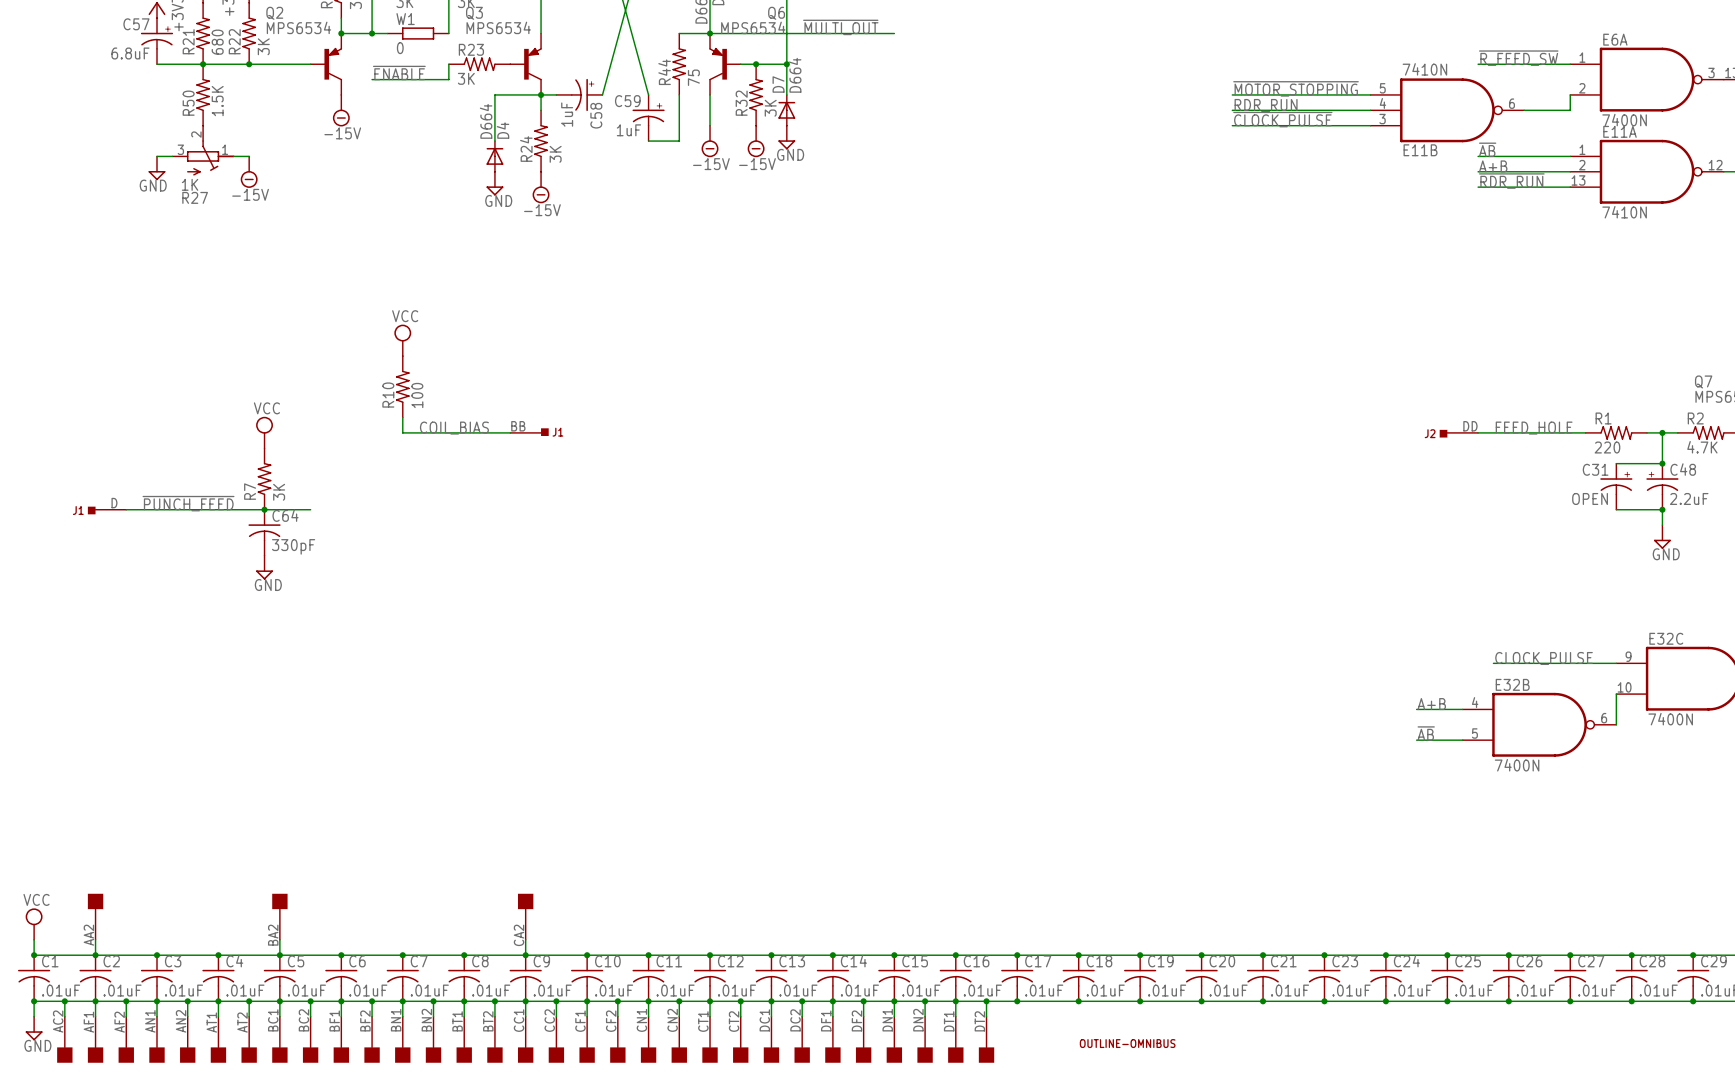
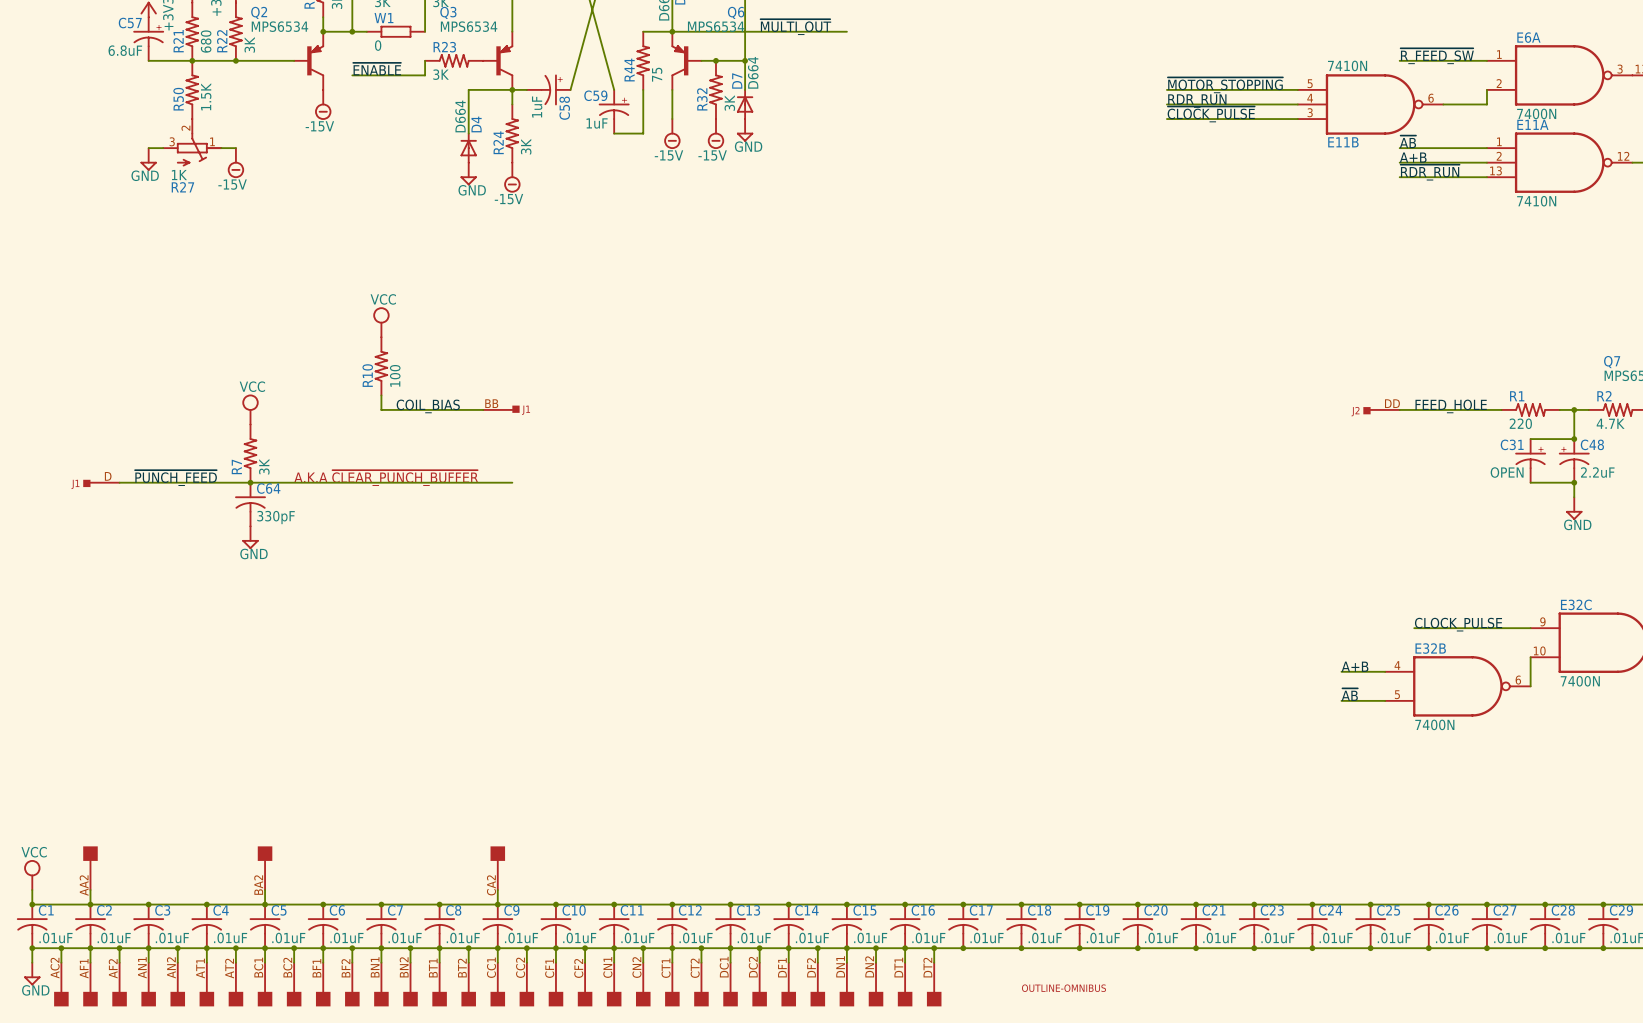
text: none -> A.K.A ~{CLEAR_PUNCH_BUFFER} (386, 478)
wire: none -> (294, 482) (512, 482)

